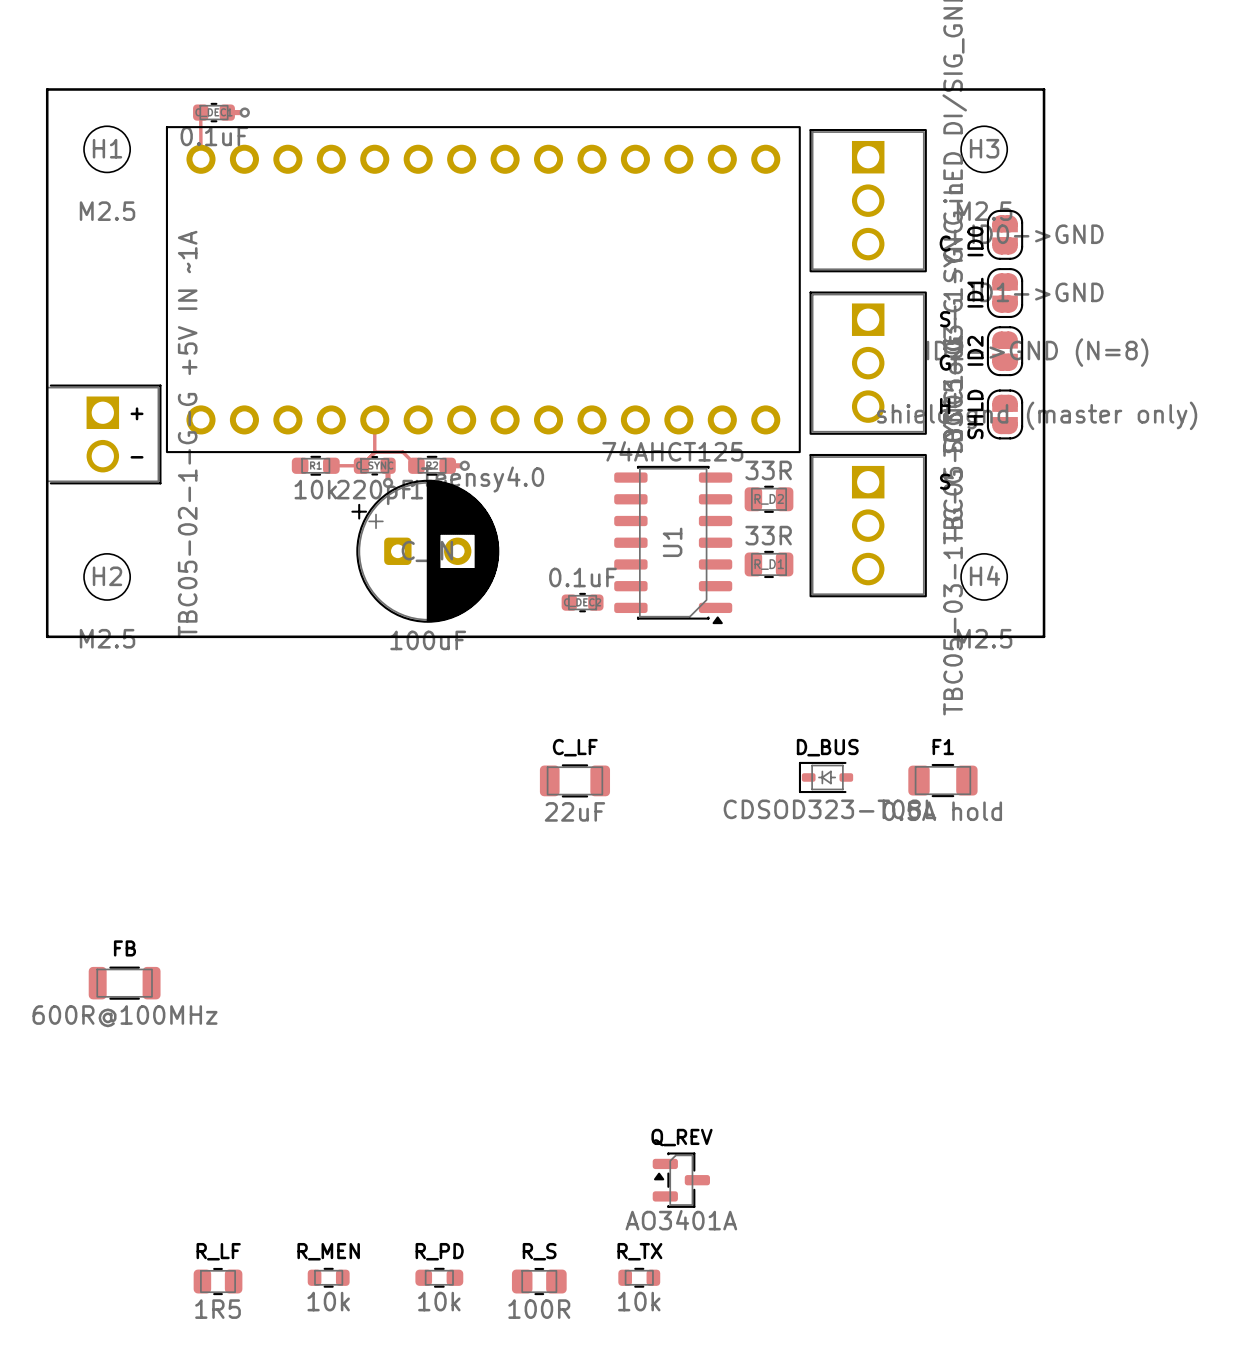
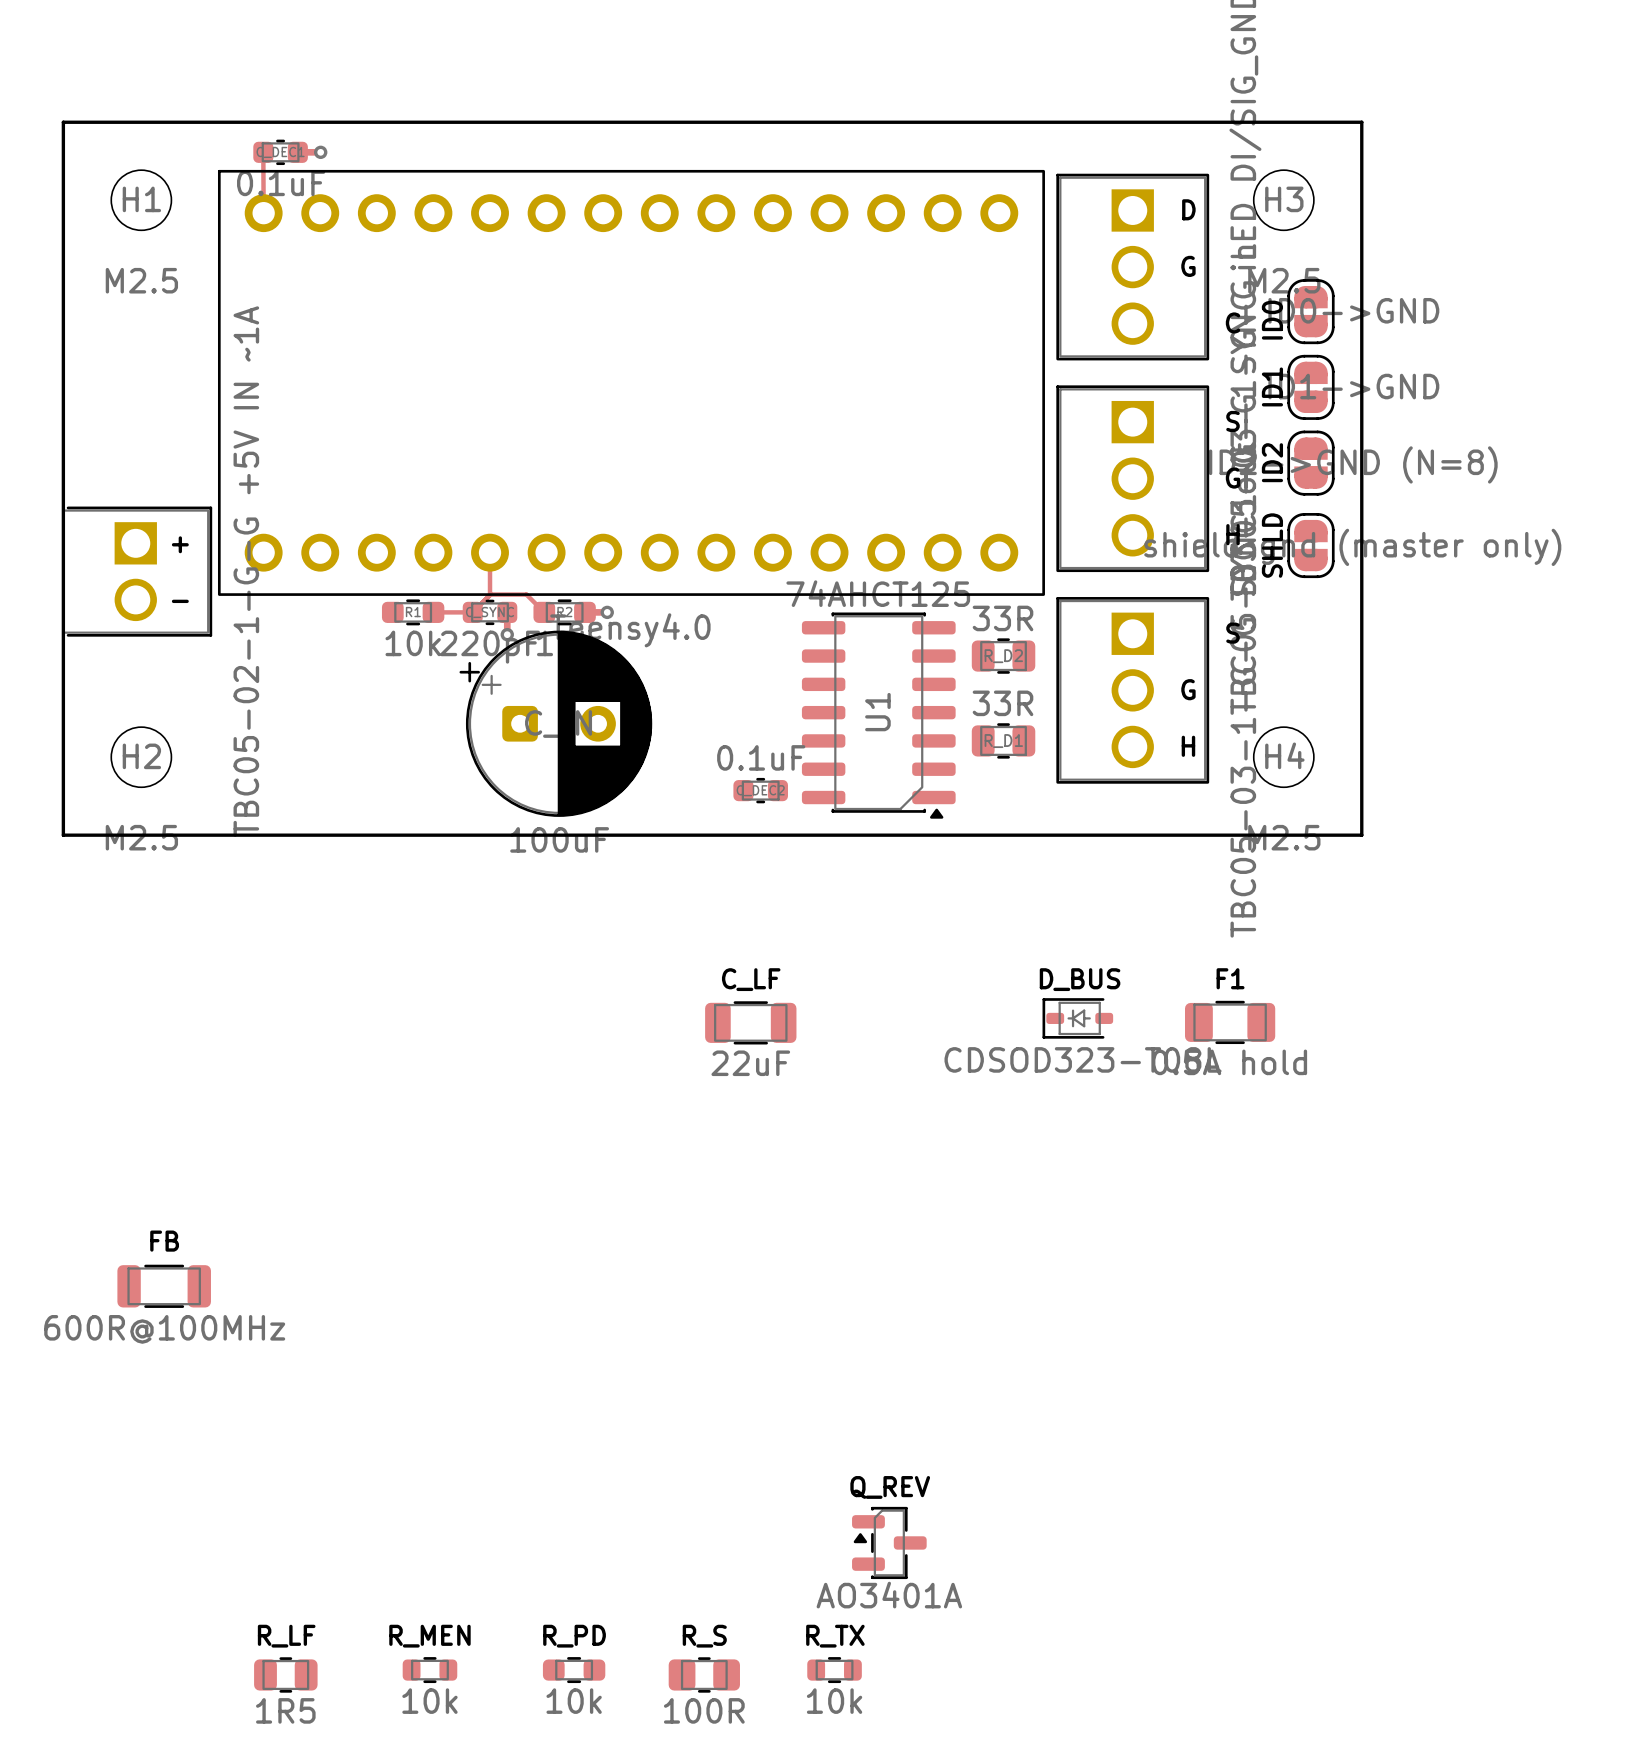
text: none -> D (1188, 209)
text: none -> G (1188, 266)
text: none -> G (1188, 689)
text: none -> H (1188, 746)

